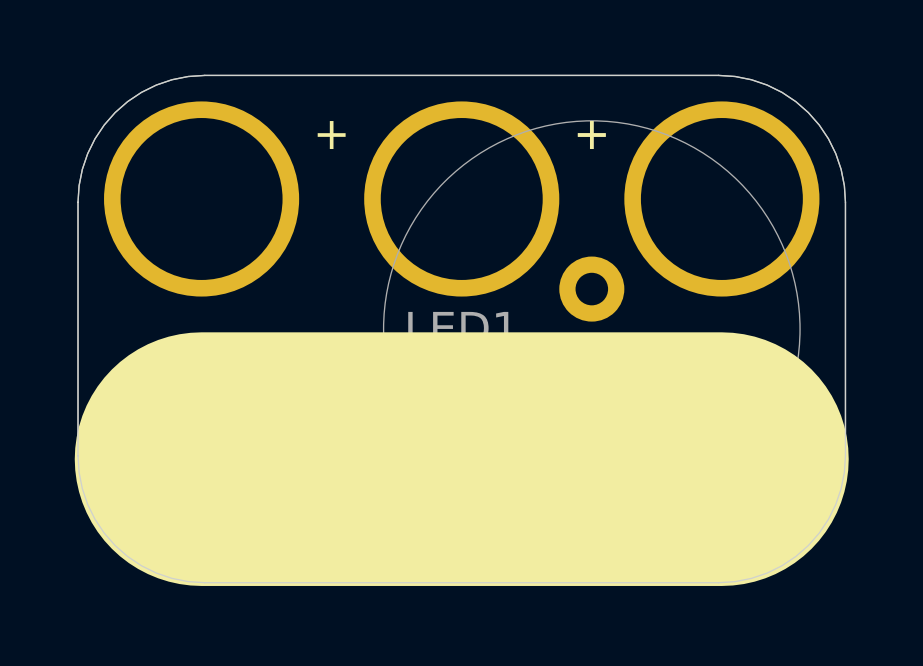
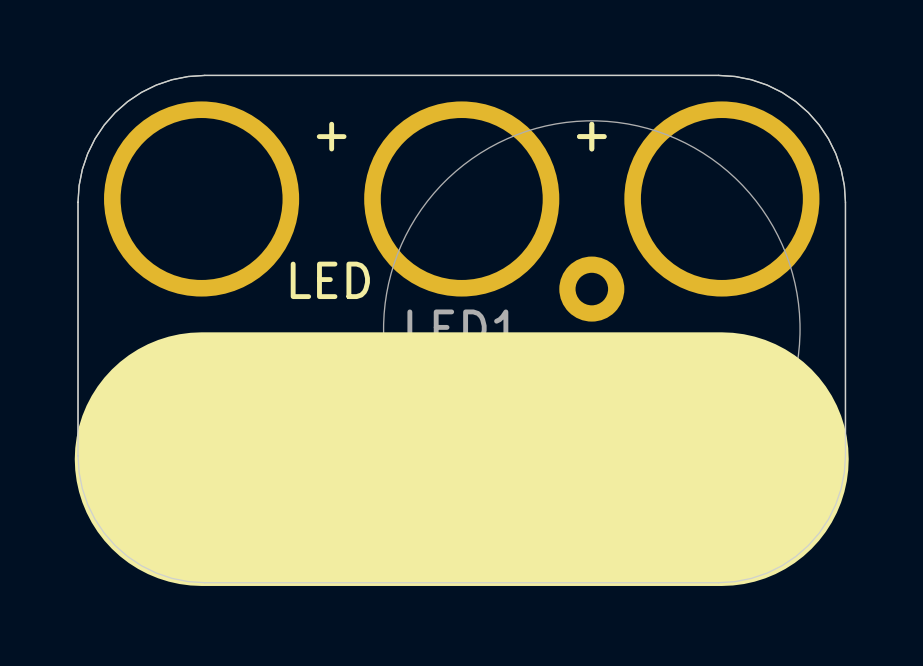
LED1 text: none -> LED (330, 280)

